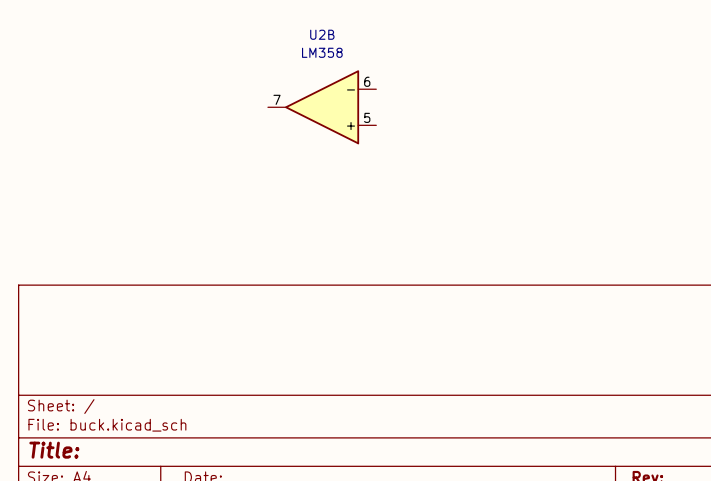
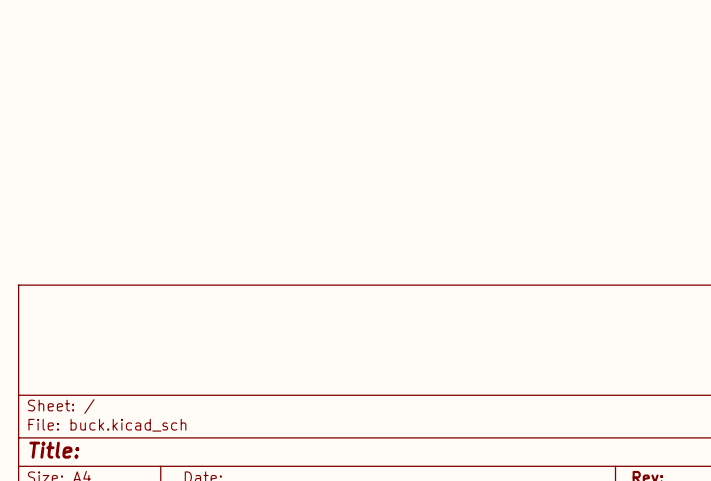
U2B: LM358 (322, 107) -> none

